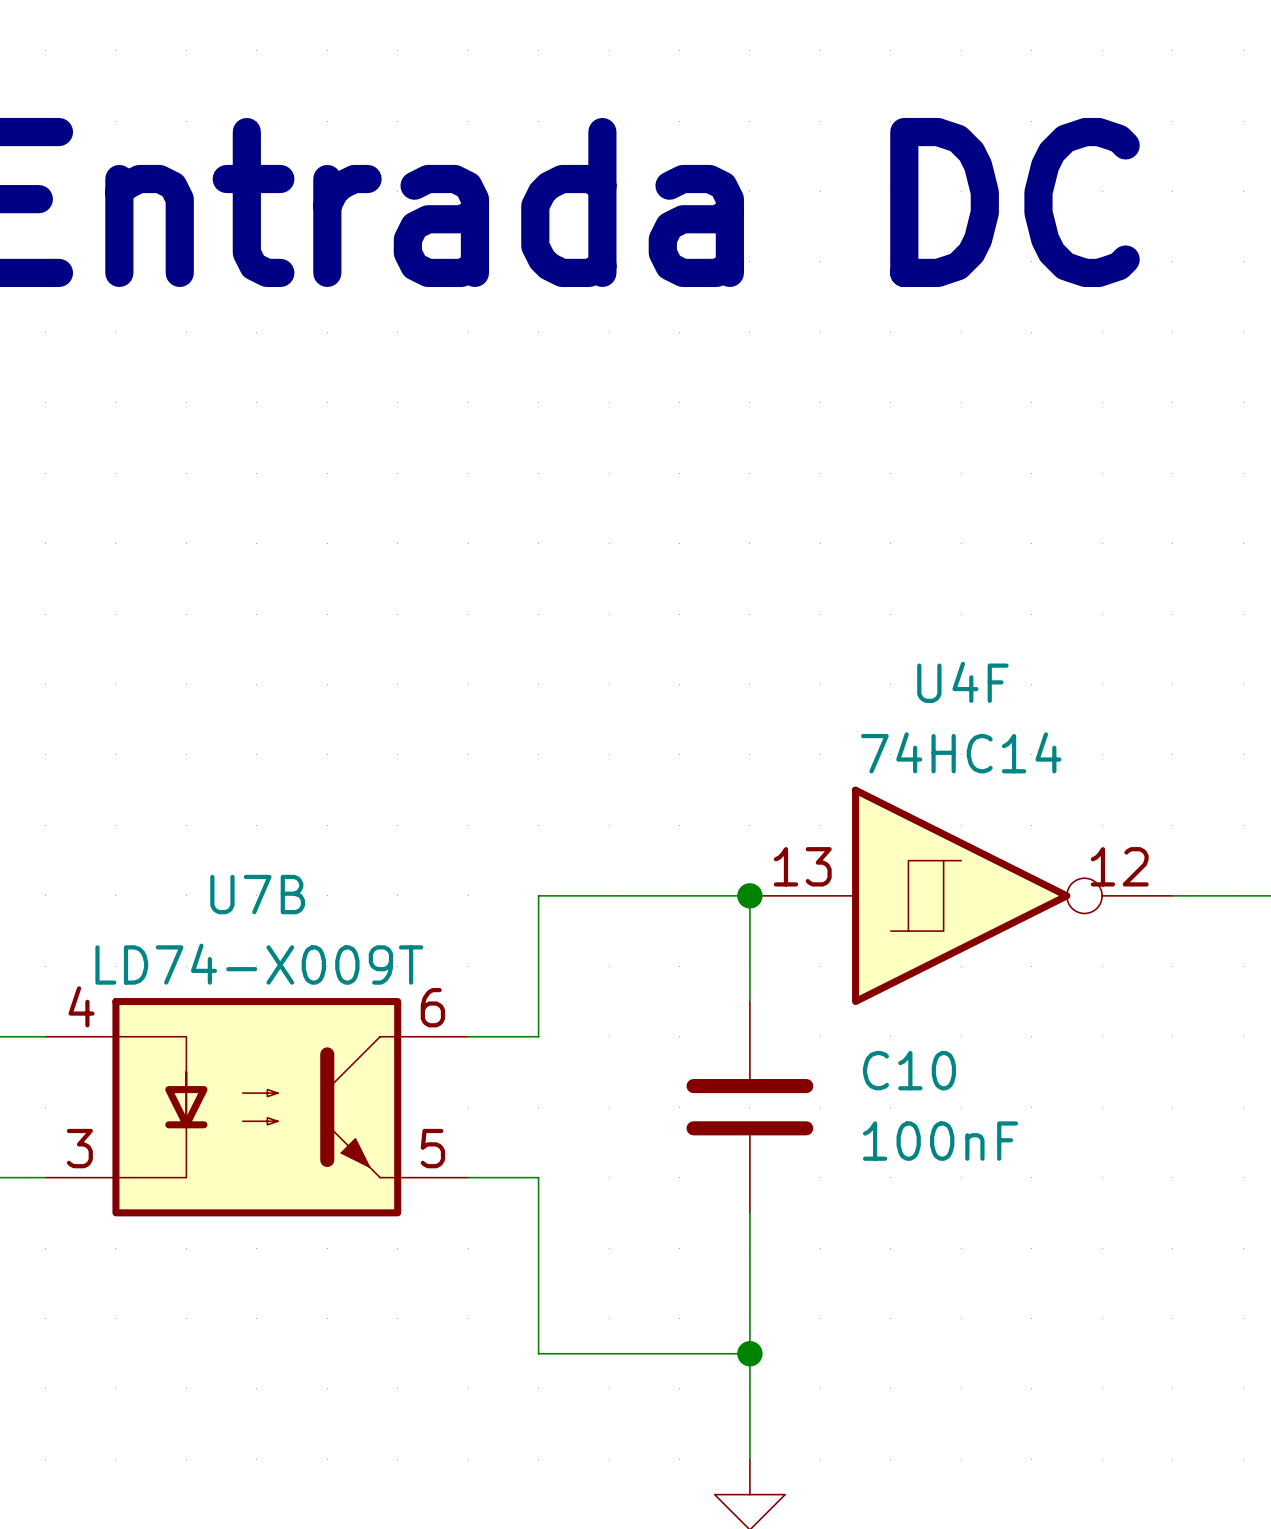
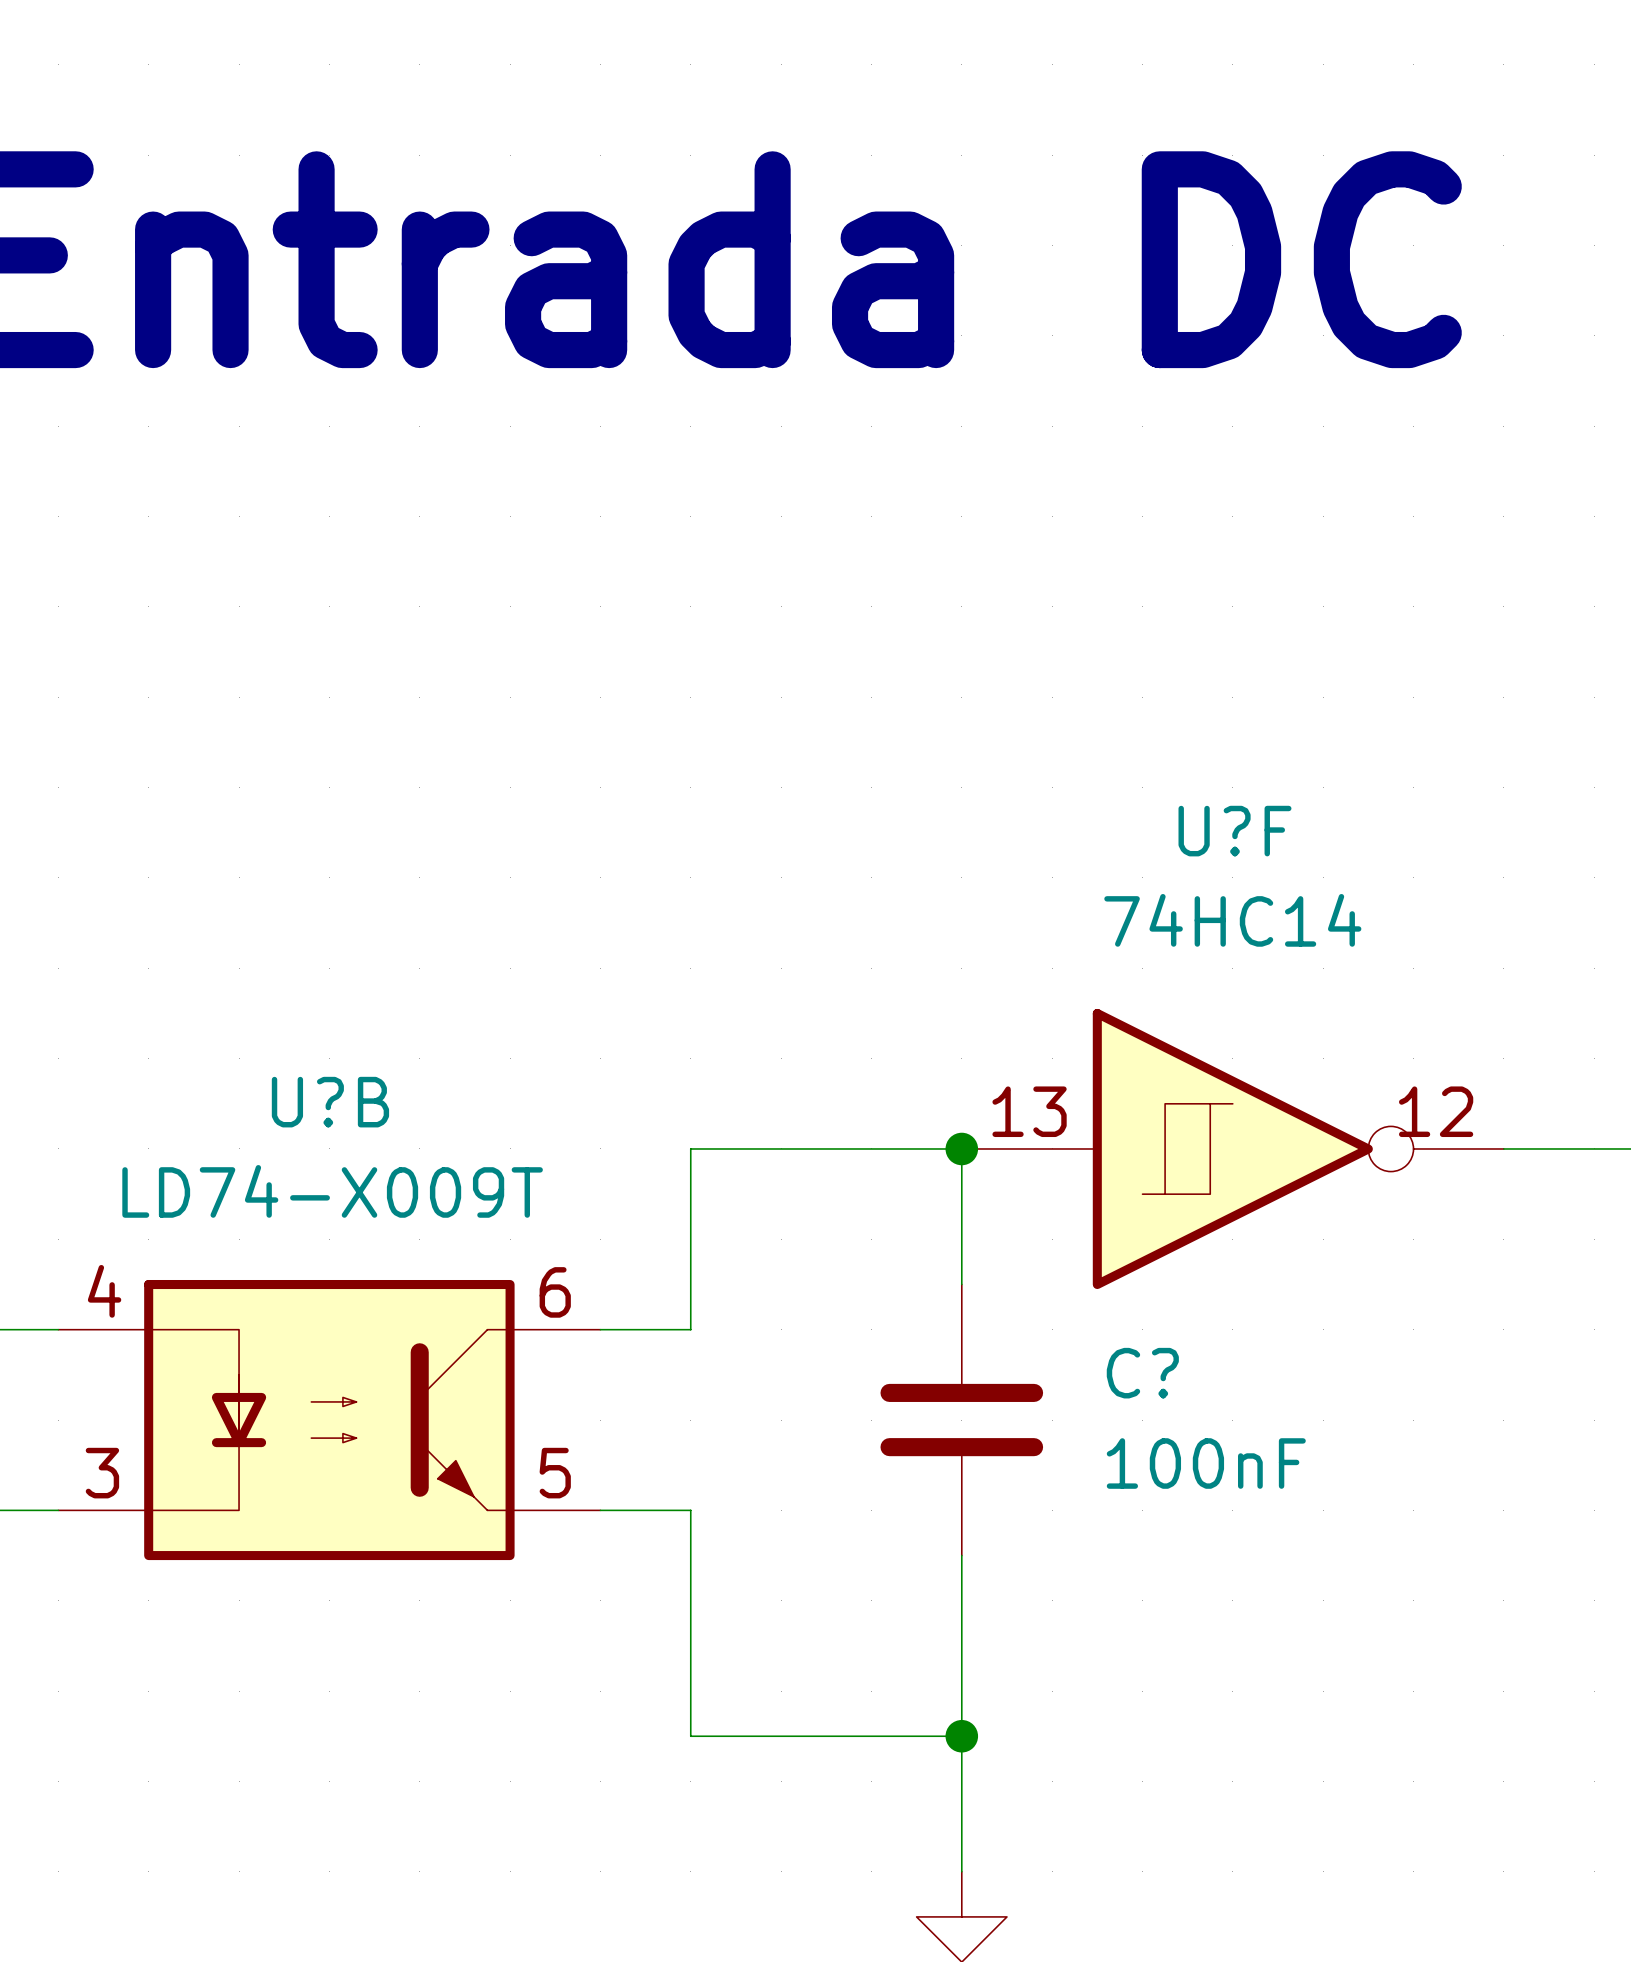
U4F name: U4F (962, 682) -> U?F (1234, 831)
U4F value position: 74HC14 (961, 752) -> 74HC14 (1232, 920)
U7B name: U7B (257, 894) -> U?B (330, 1102)
U7B value position: LD74-X009T (259, 964) -> LD74-X009T (332, 1191)
C10 name: C10 (909, 1070) -> C? (1142, 1373)

